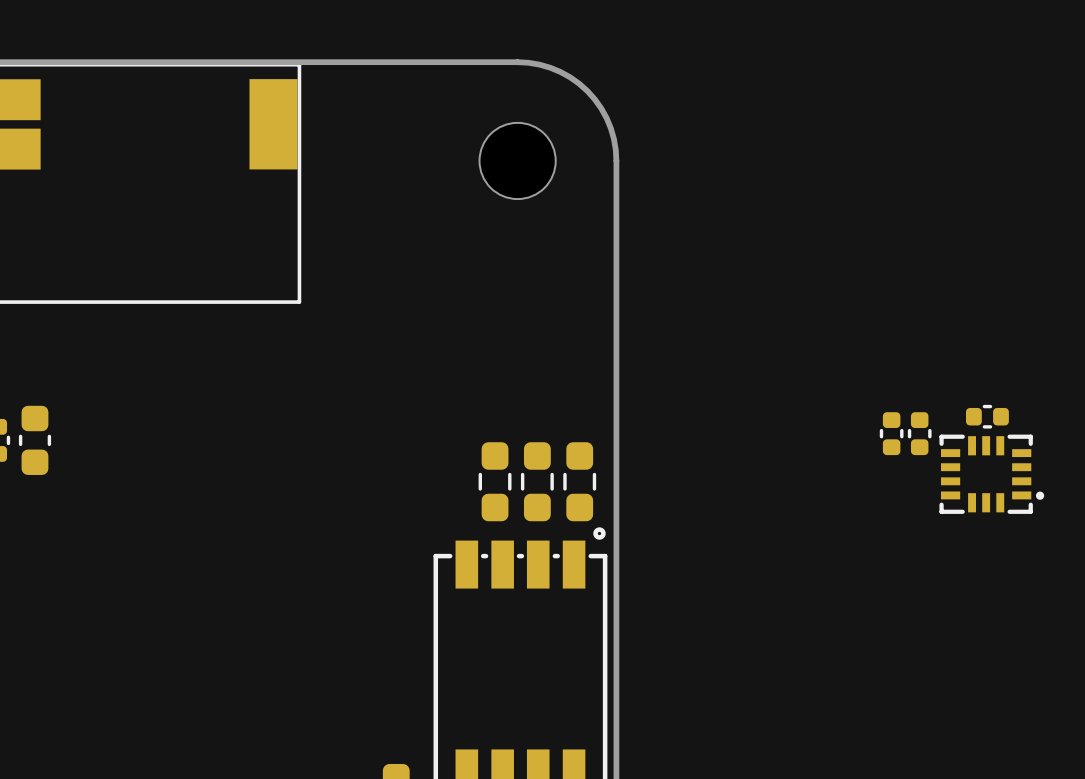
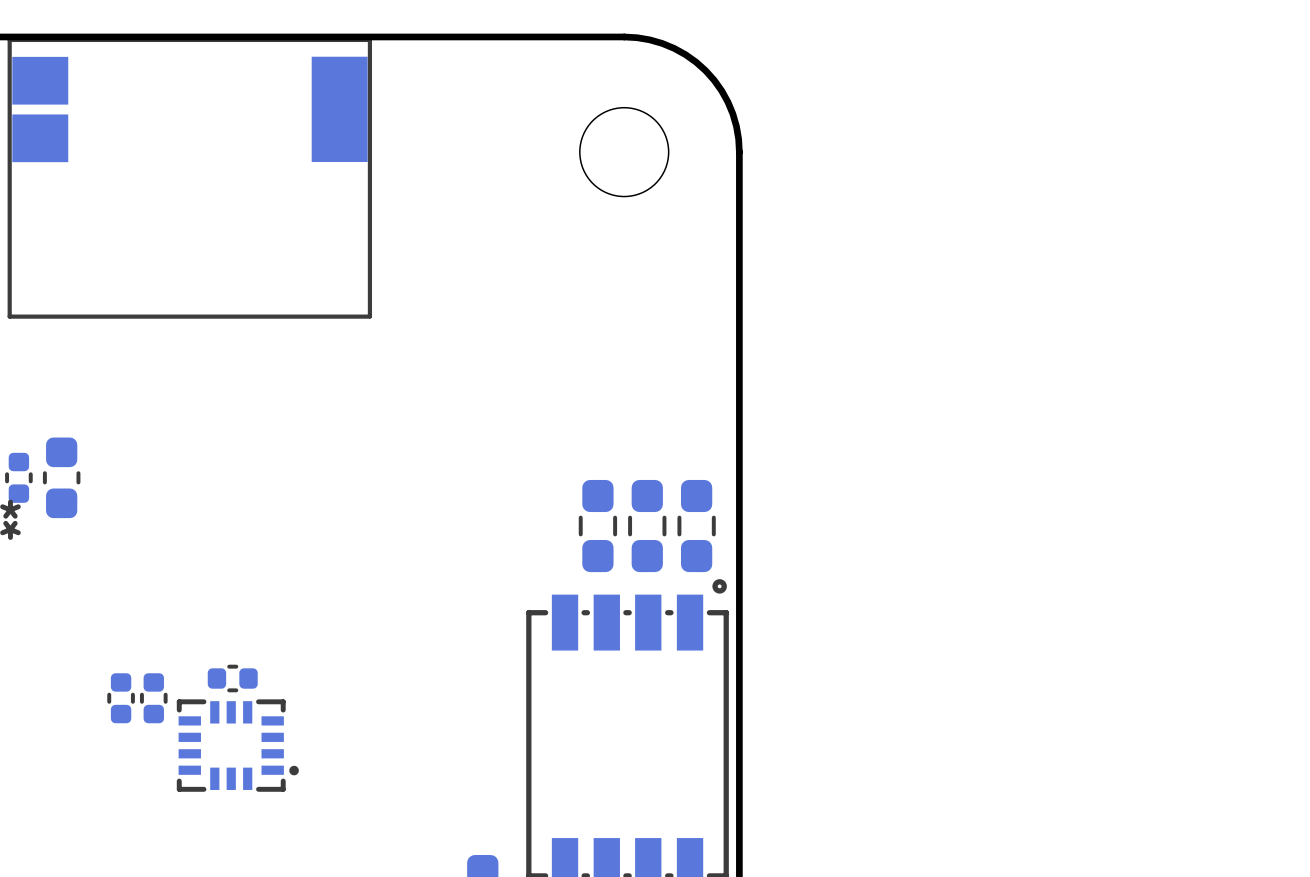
part: (987, 416) -> none
part: (891, 433) -> none
part: (919, 433) -> none
part: (991, 474) -> none
part: none -> (232, 678)
part: none -> (121, 698)
part: none -> (153, 698)
part: none -> (237, 745)

